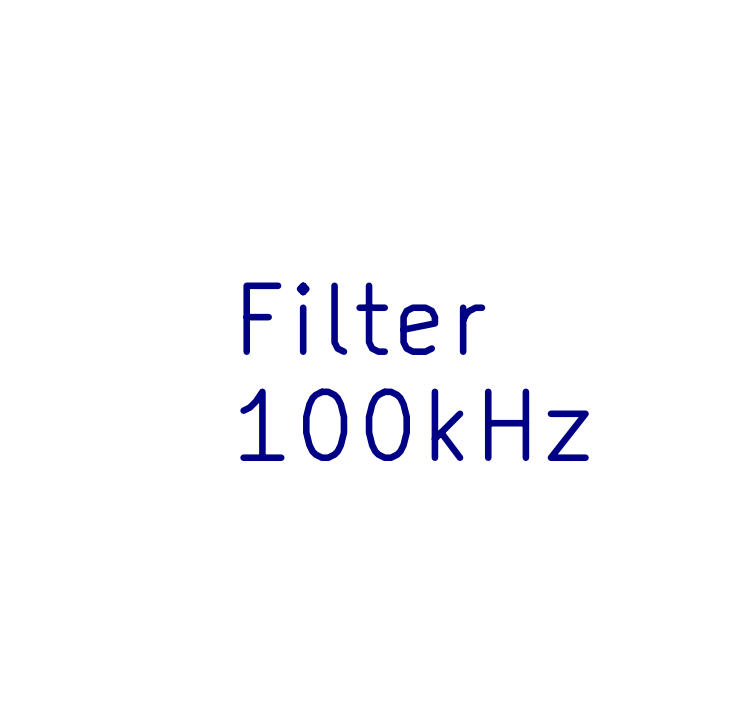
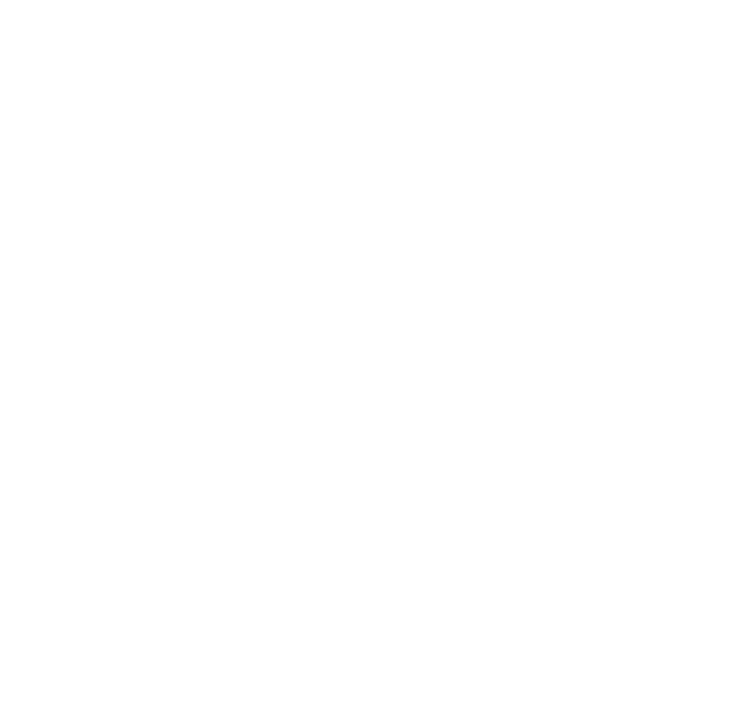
text: Filter (364, 318) -> none
text: 100kHz (414, 424) -> none

